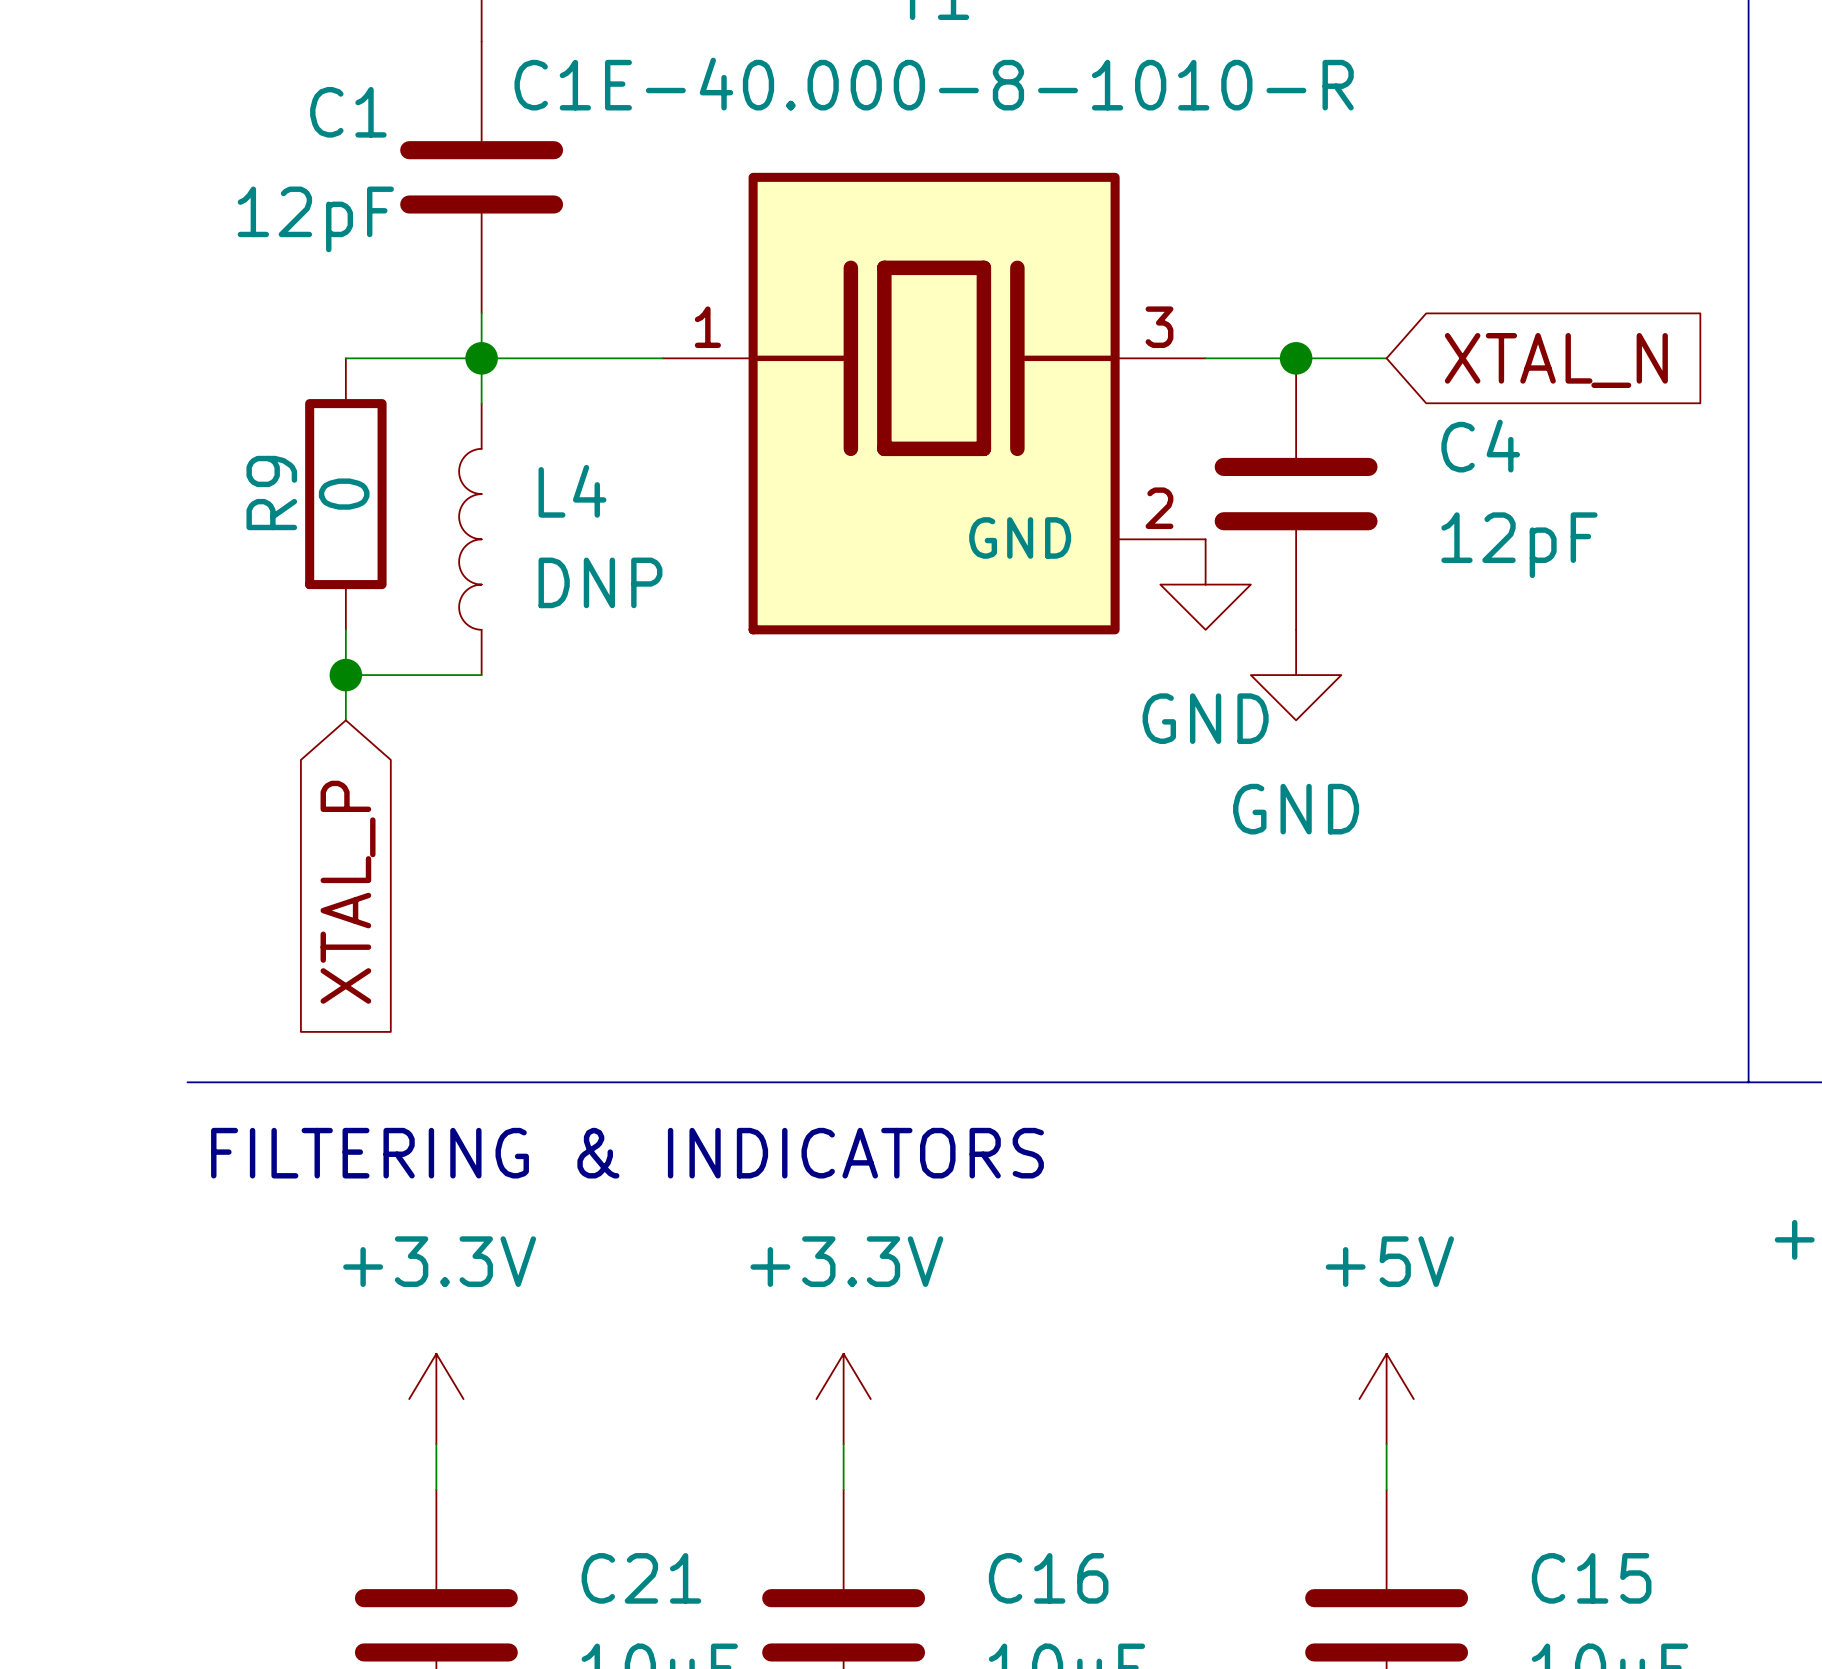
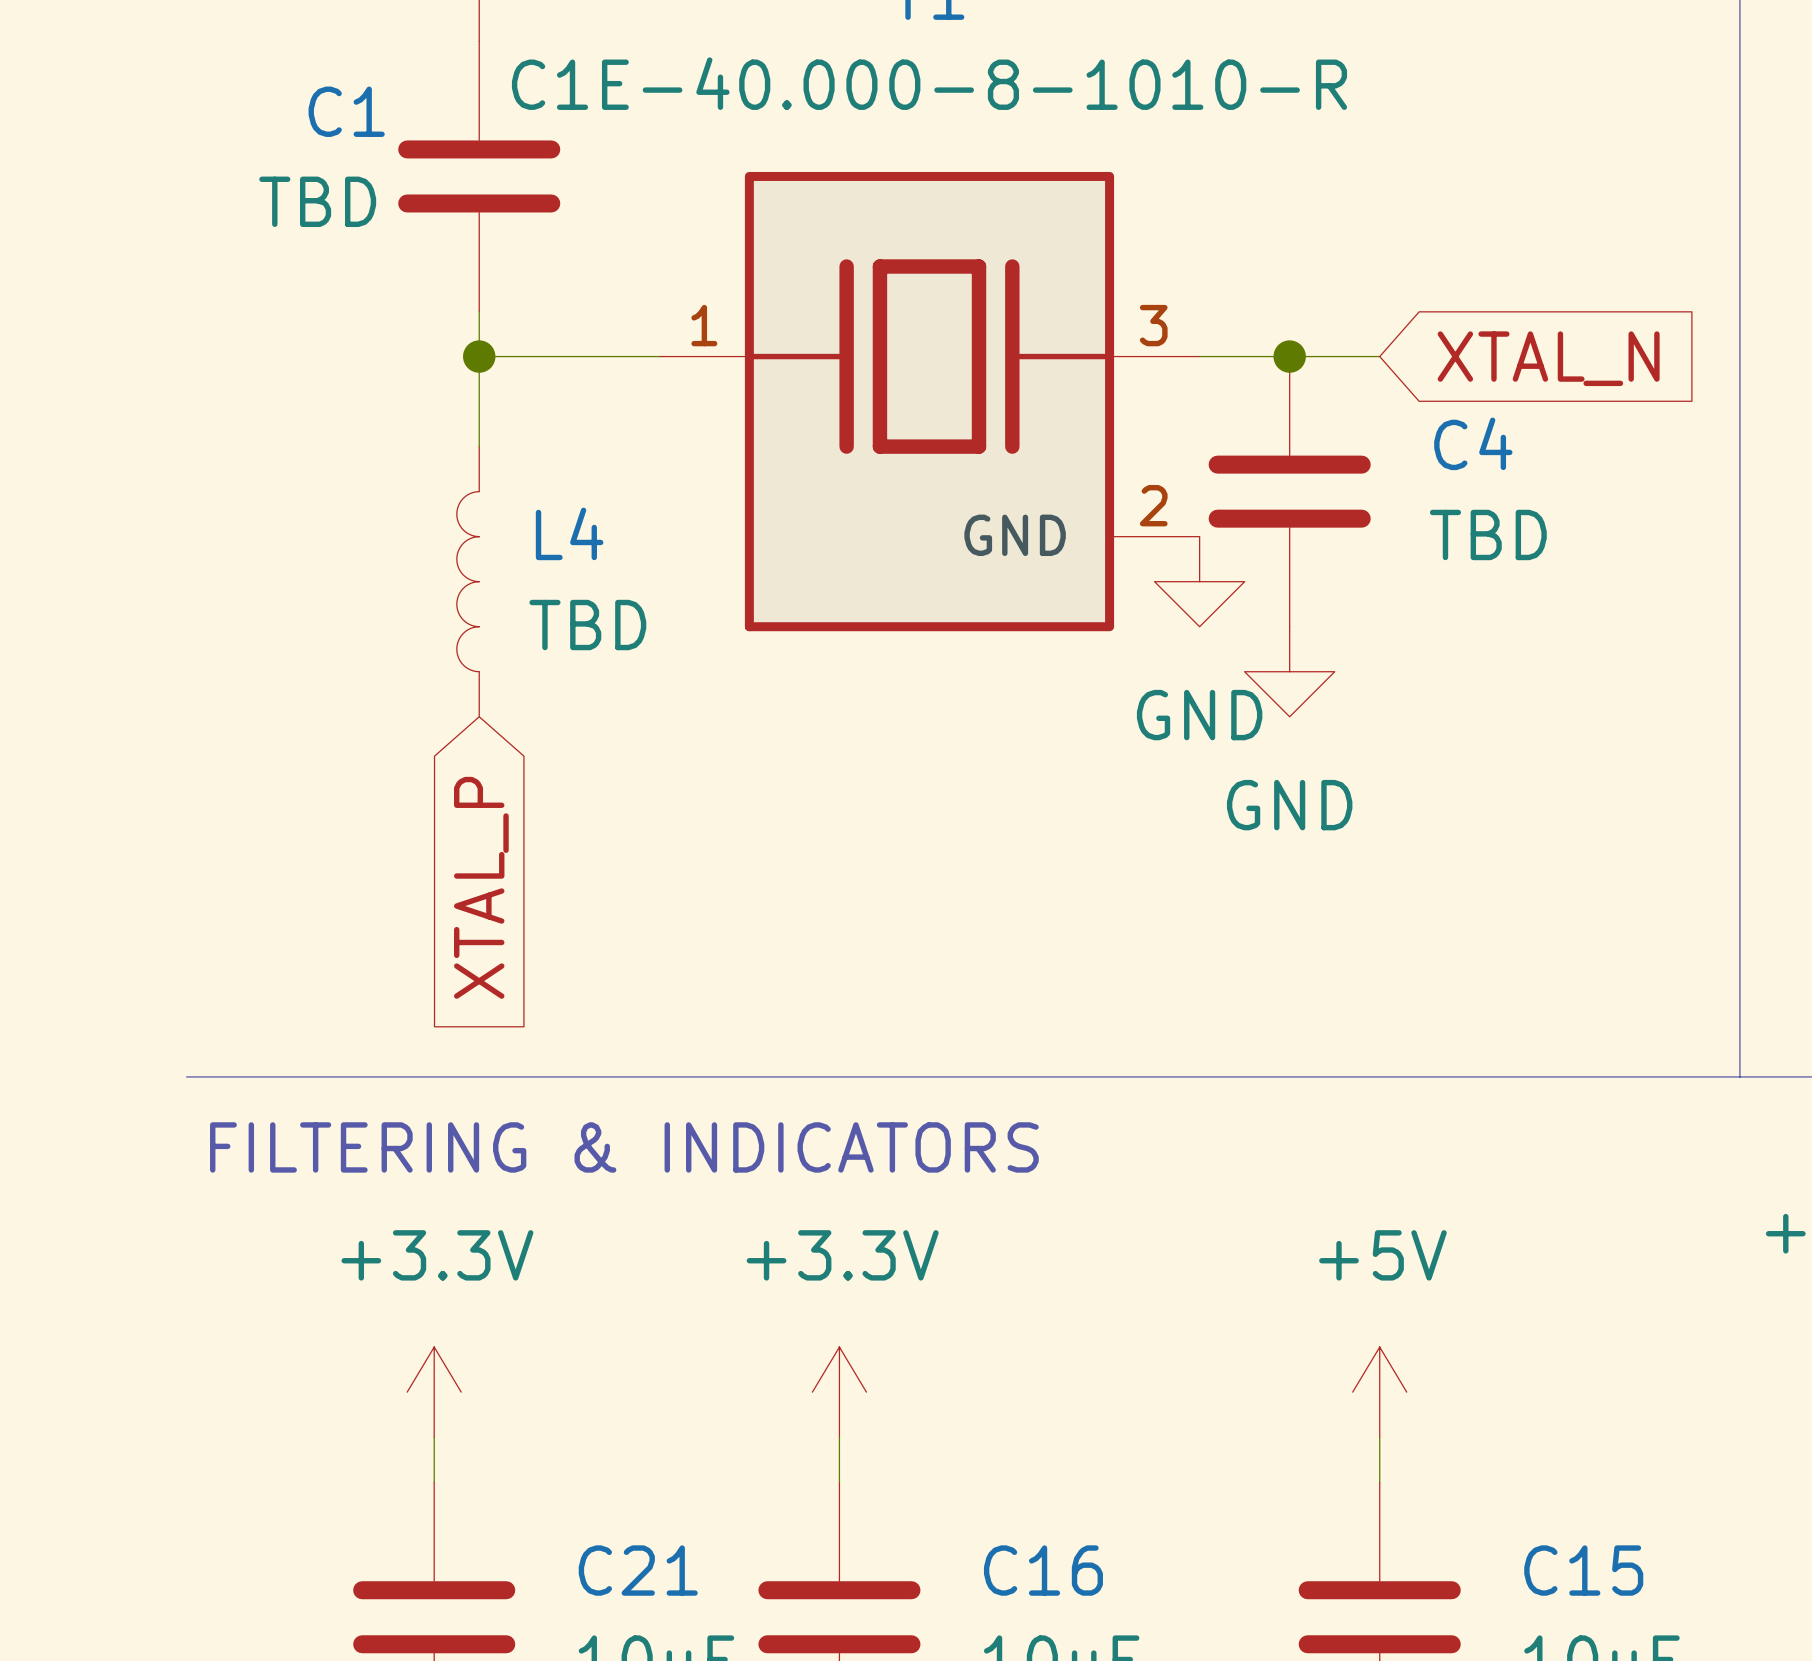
C1 value: 12pF (315, 219) -> TBD (317, 201)
wire: (345, 358) (481, 358) -> none
R9: 0 (345, 494) -> none
L4 position: (470, 539) -> (468, 581)
C4 value: 12pF (1519, 545) -> TBD (1488, 534)
L4 value: DNP (600, 582) -> TBD (587, 625)
wire: (345, 629) (345, 720) -> none
wire: (345, 675) (481, 675) -> none
junction: (345, 675) -> none
global label position: XTAL_P (348, 892) -> XTAL_P (481, 887)

